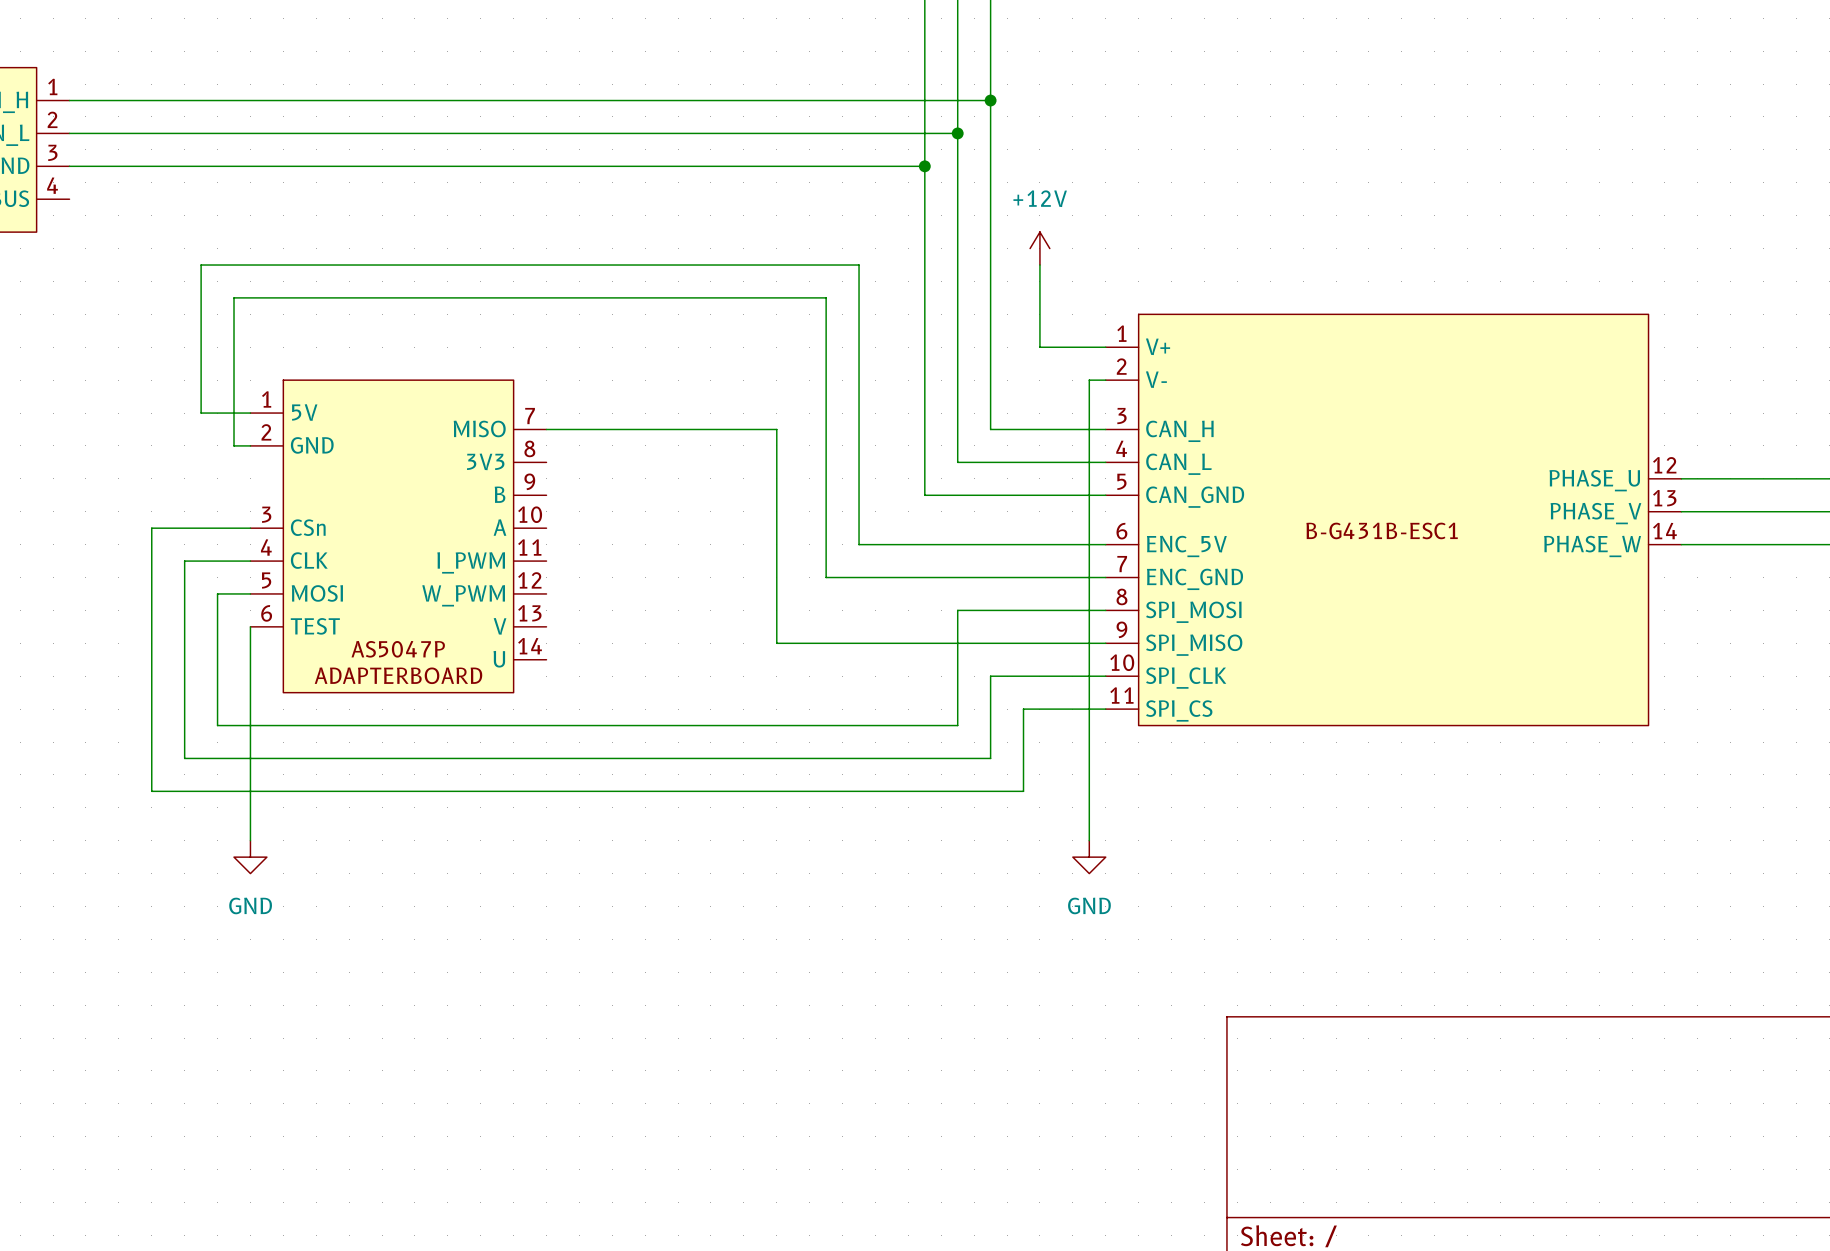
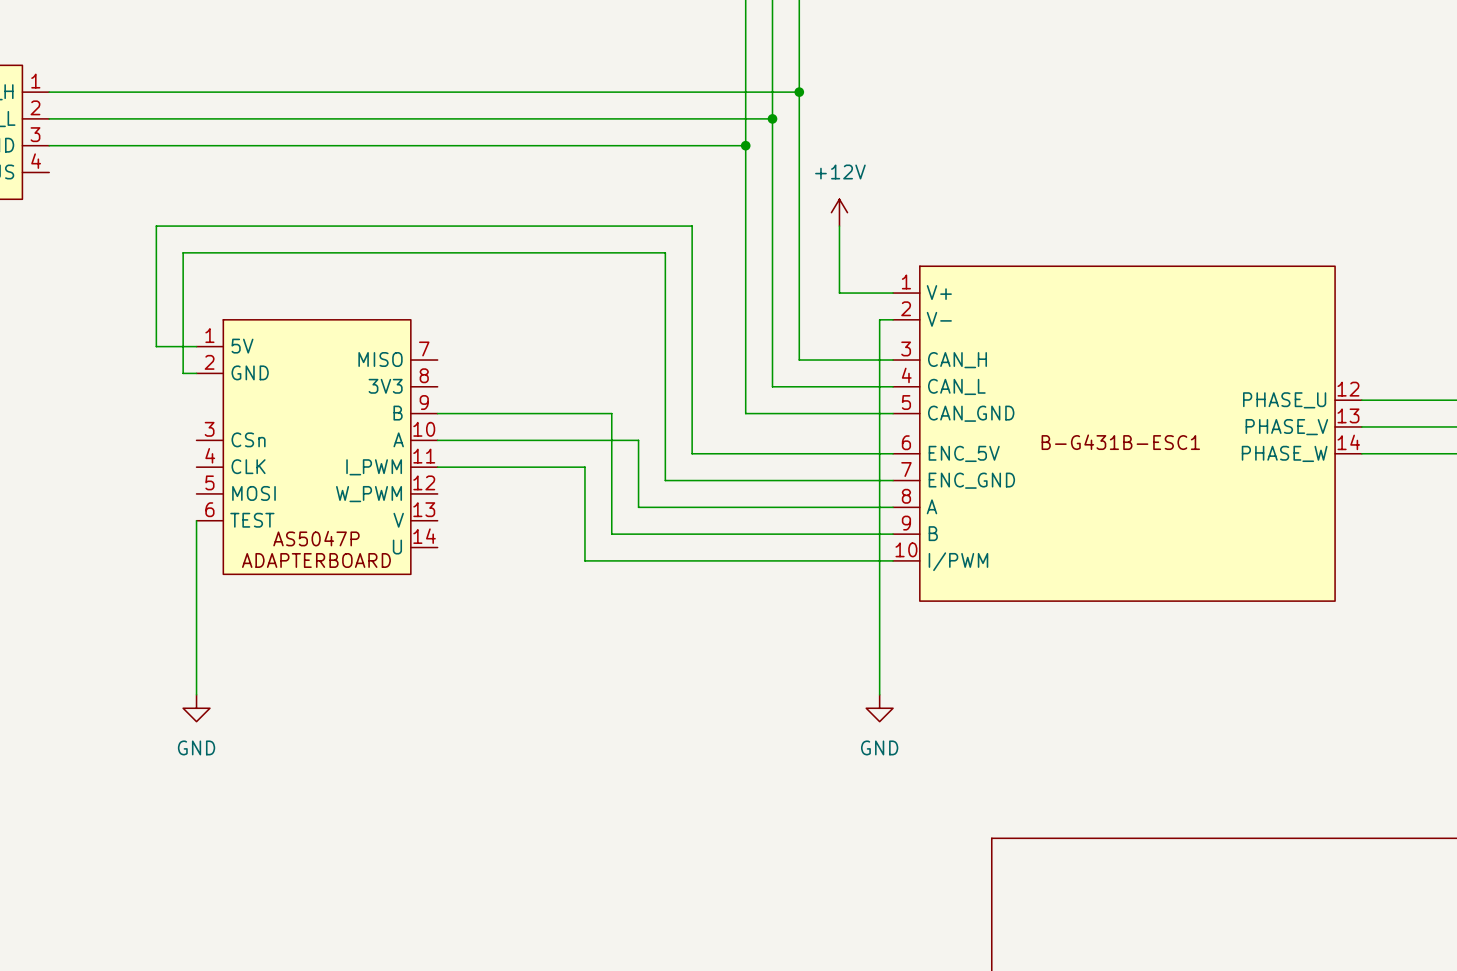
part symbol: [1105, 314, 1682, 726] -> [893, 266, 1362, 602]
wire: (546, 429) (776, 429) (776, 643) -> (437, 413) (611, 413) (611, 534) (625, 534)
wire: (250, 528) (151, 528) (151, 791) (1023, 791) (1023, 709) (1105, 709) -> none
wire: (250, 561) (184, 561) (184, 758) (990, 758) (990, 676) -> (437, 467) (584, 467) (584, 560) (799, 560)
wire: (250, 593) (217, 593) (217, 725) (957, 725) (957, 610) -> (437, 440) (638, 440) (638, 507) (772, 507)

